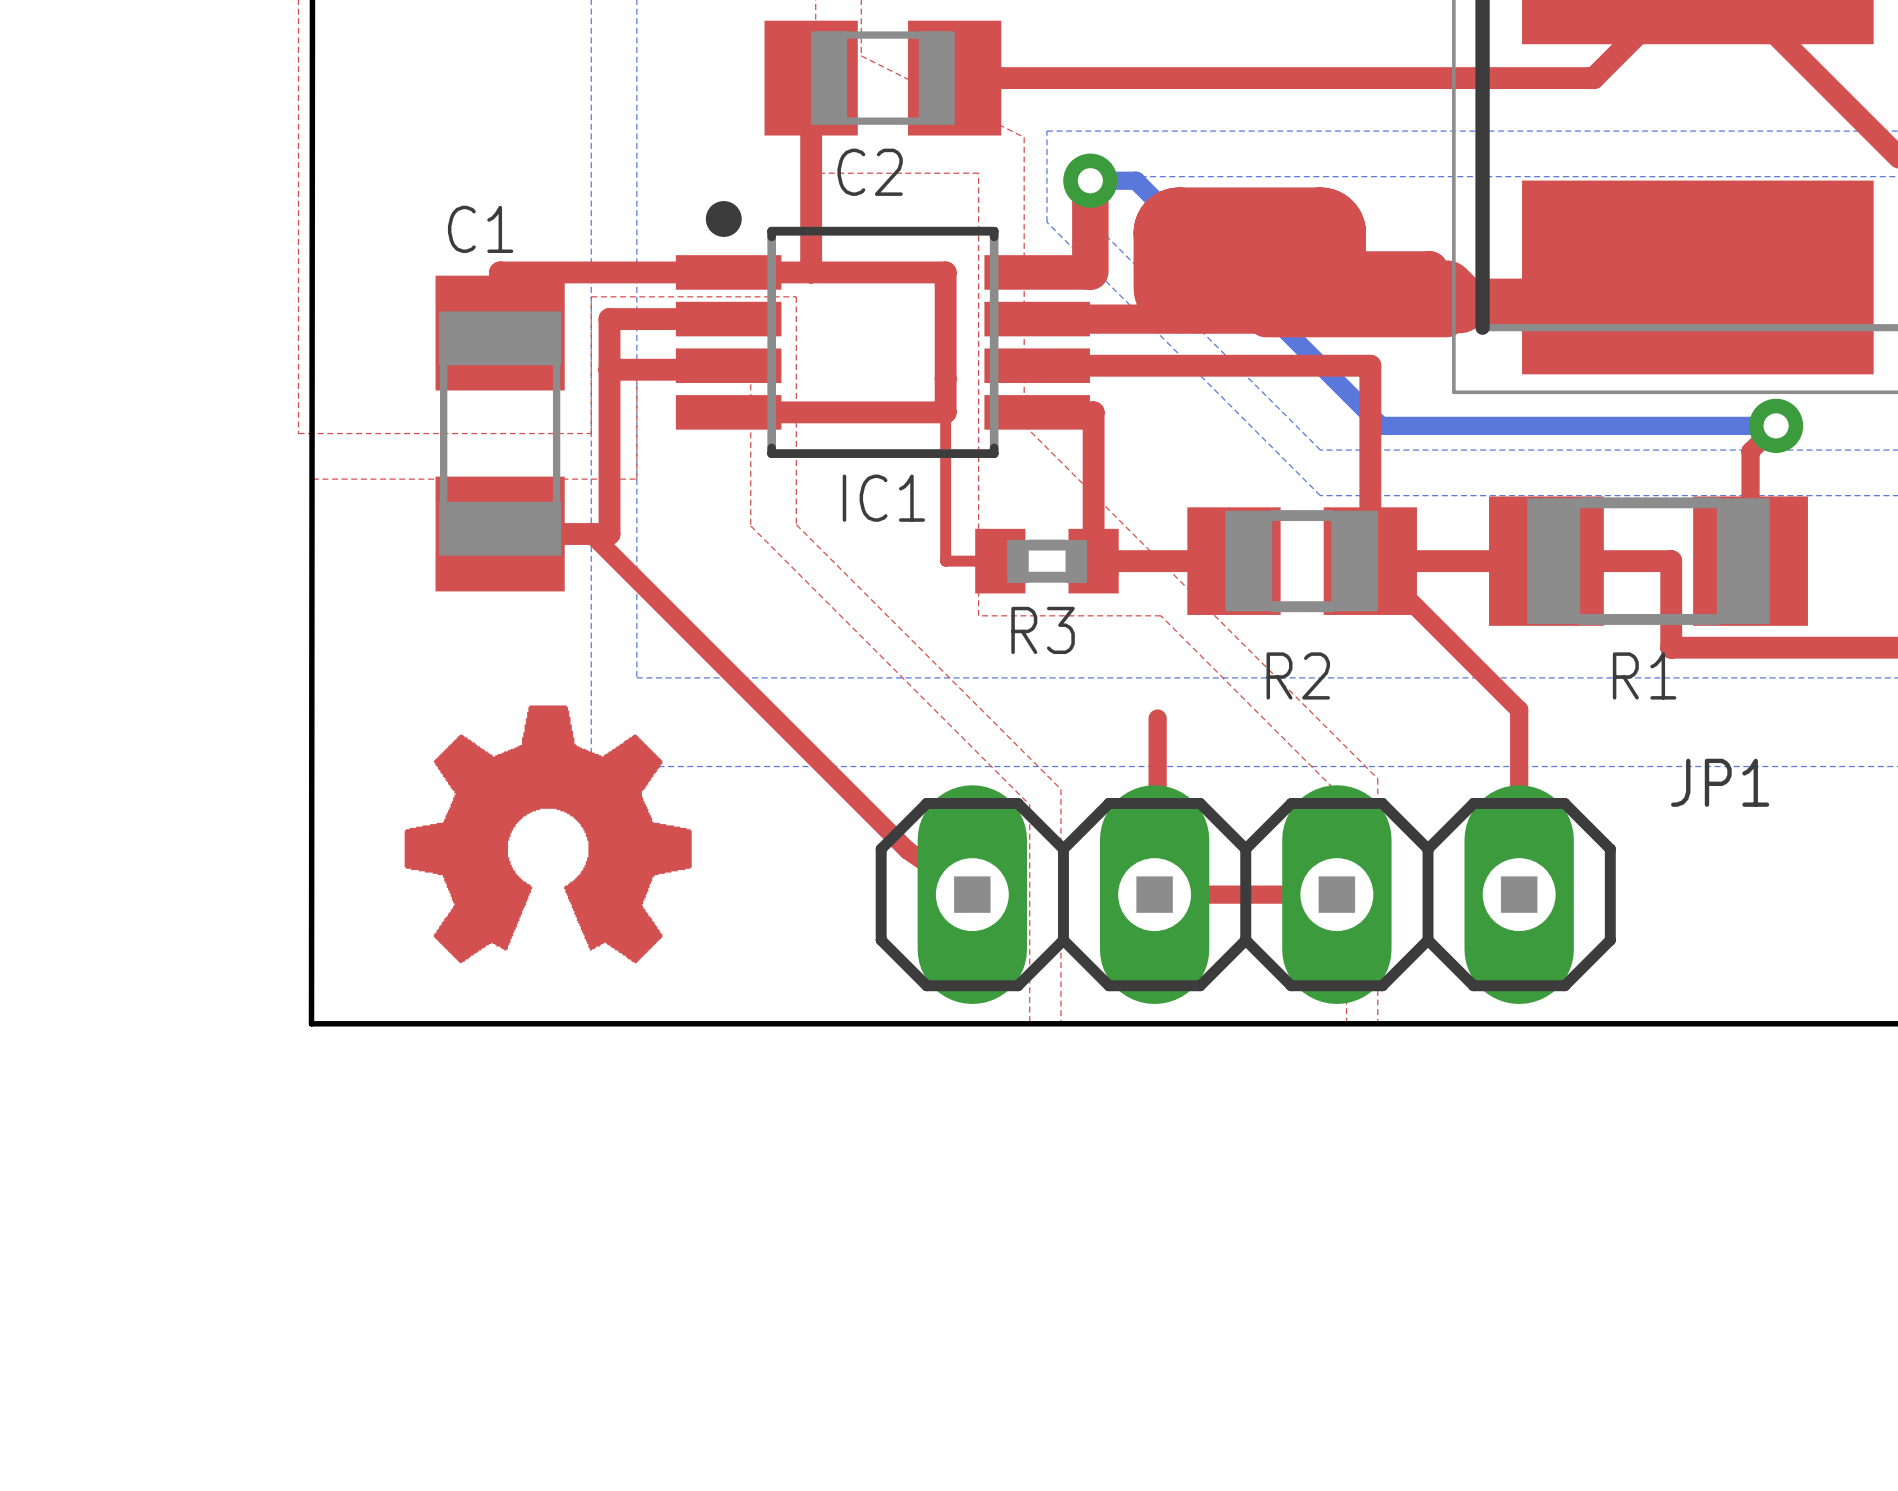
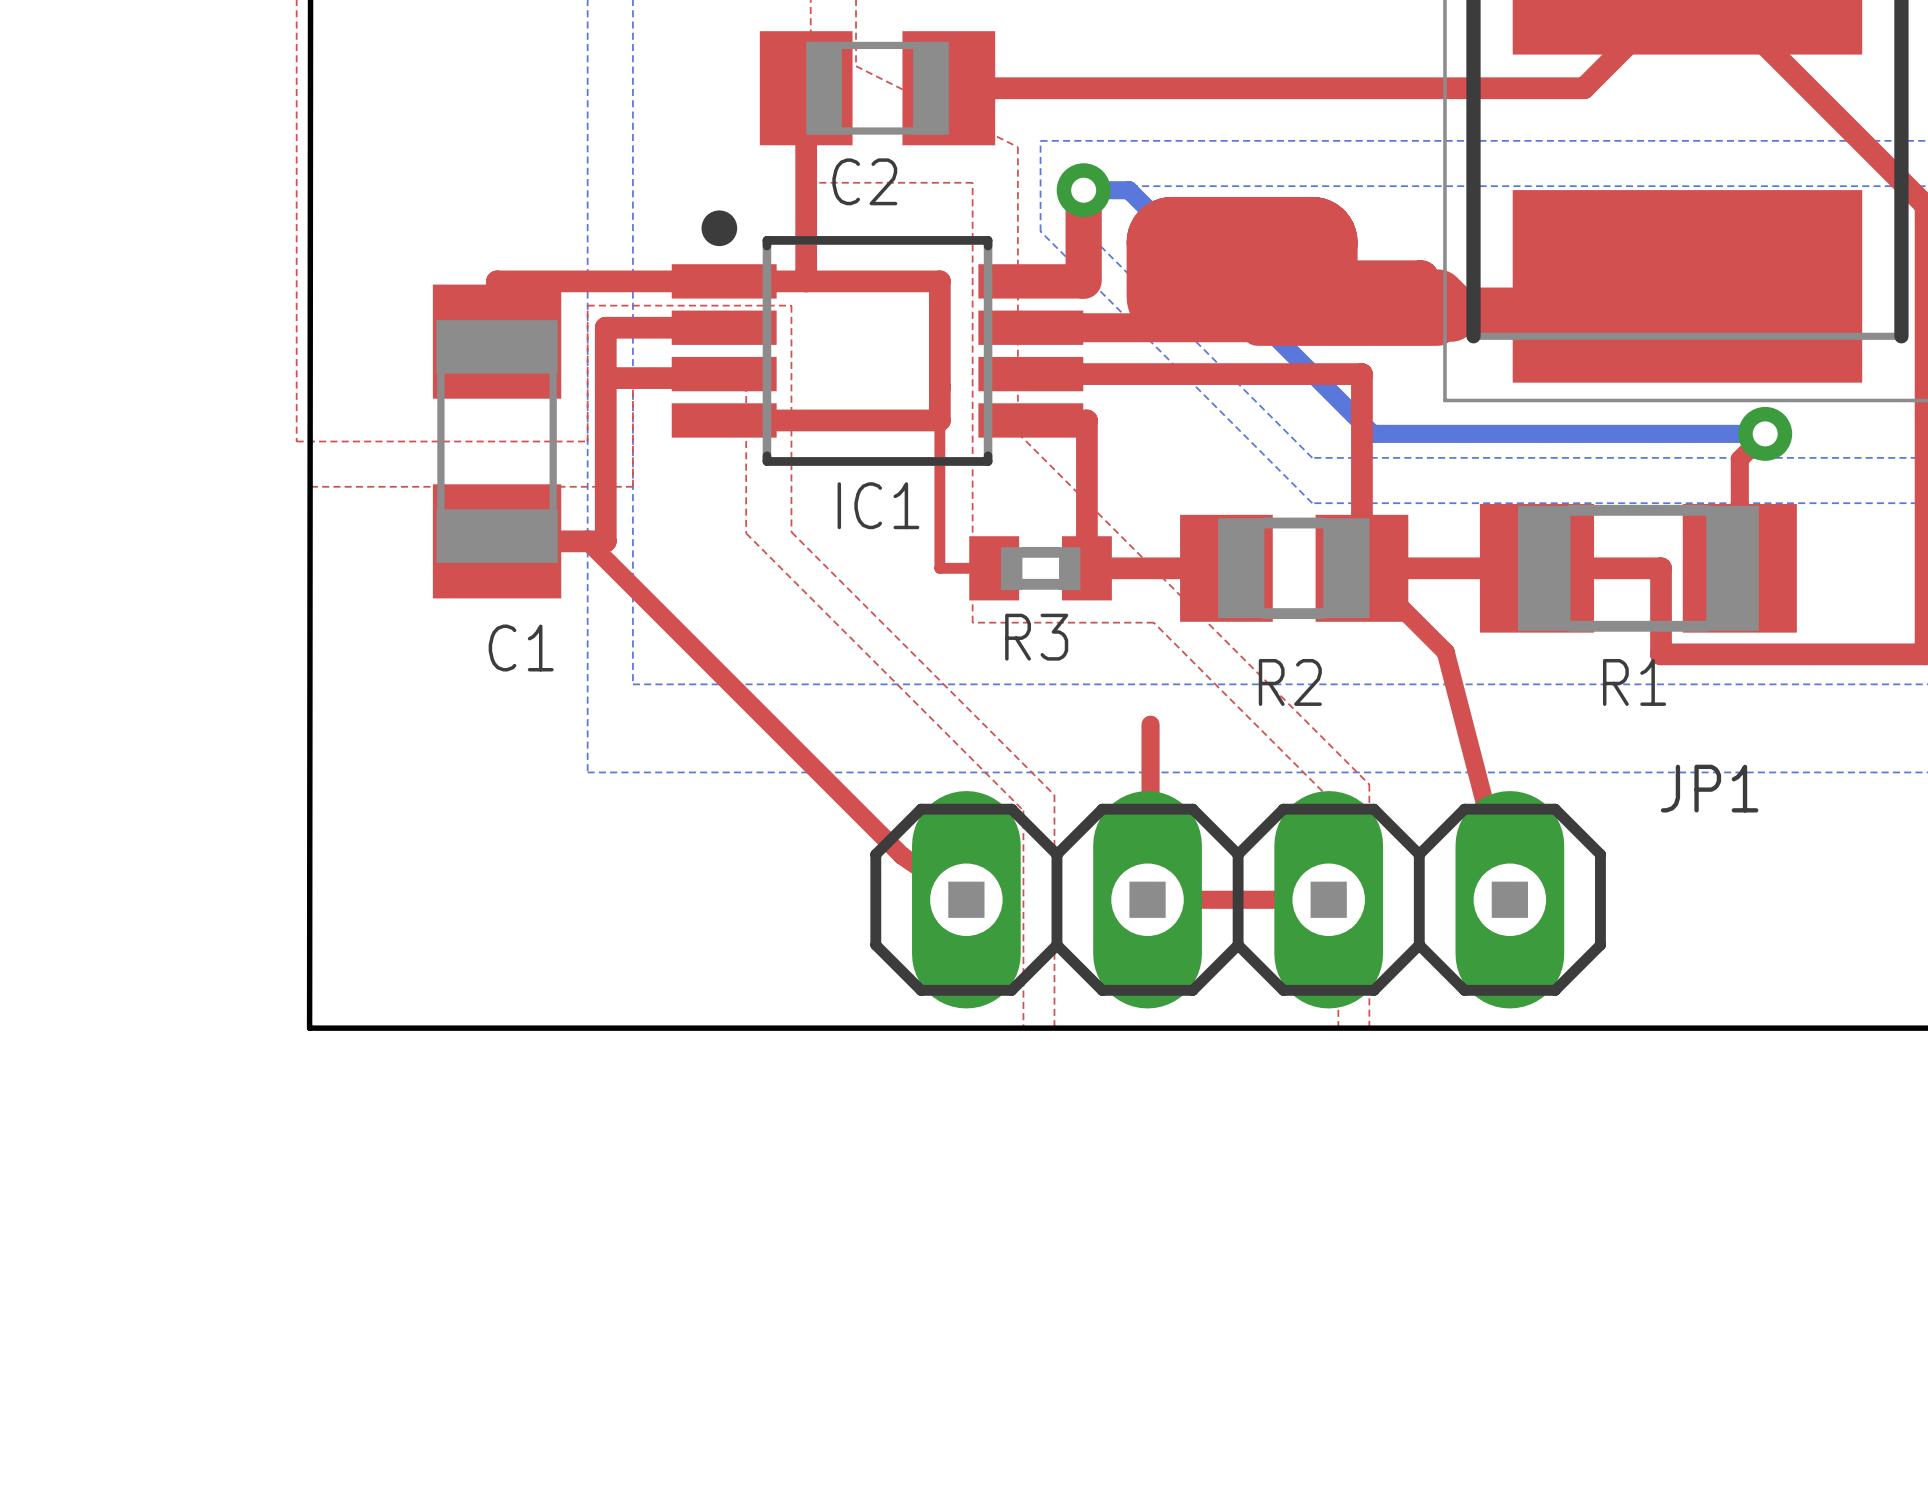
text position: C1 (480, 229) -> C1 (521, 648)
top track: (1454, 645) (1519, 709) (1519, 894) -> (1445, 652) (1509, 899)
drawing: [404, 705, 692, 964] -> none

